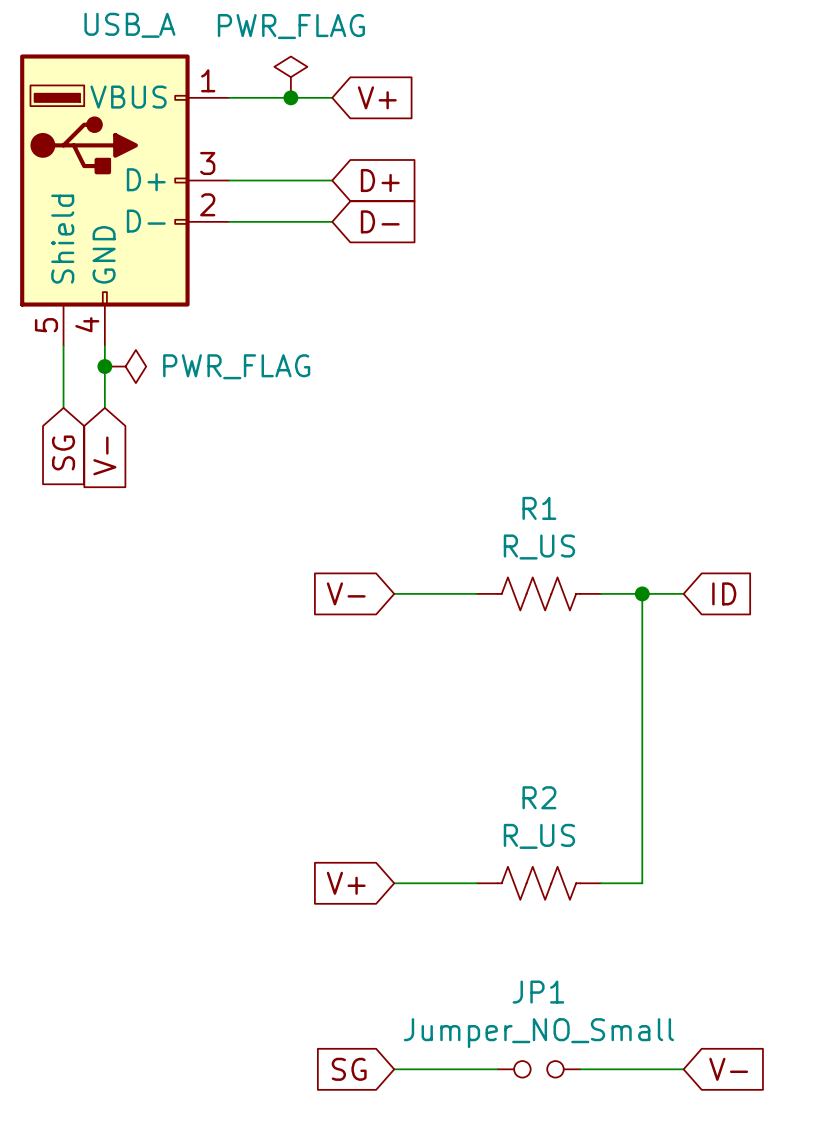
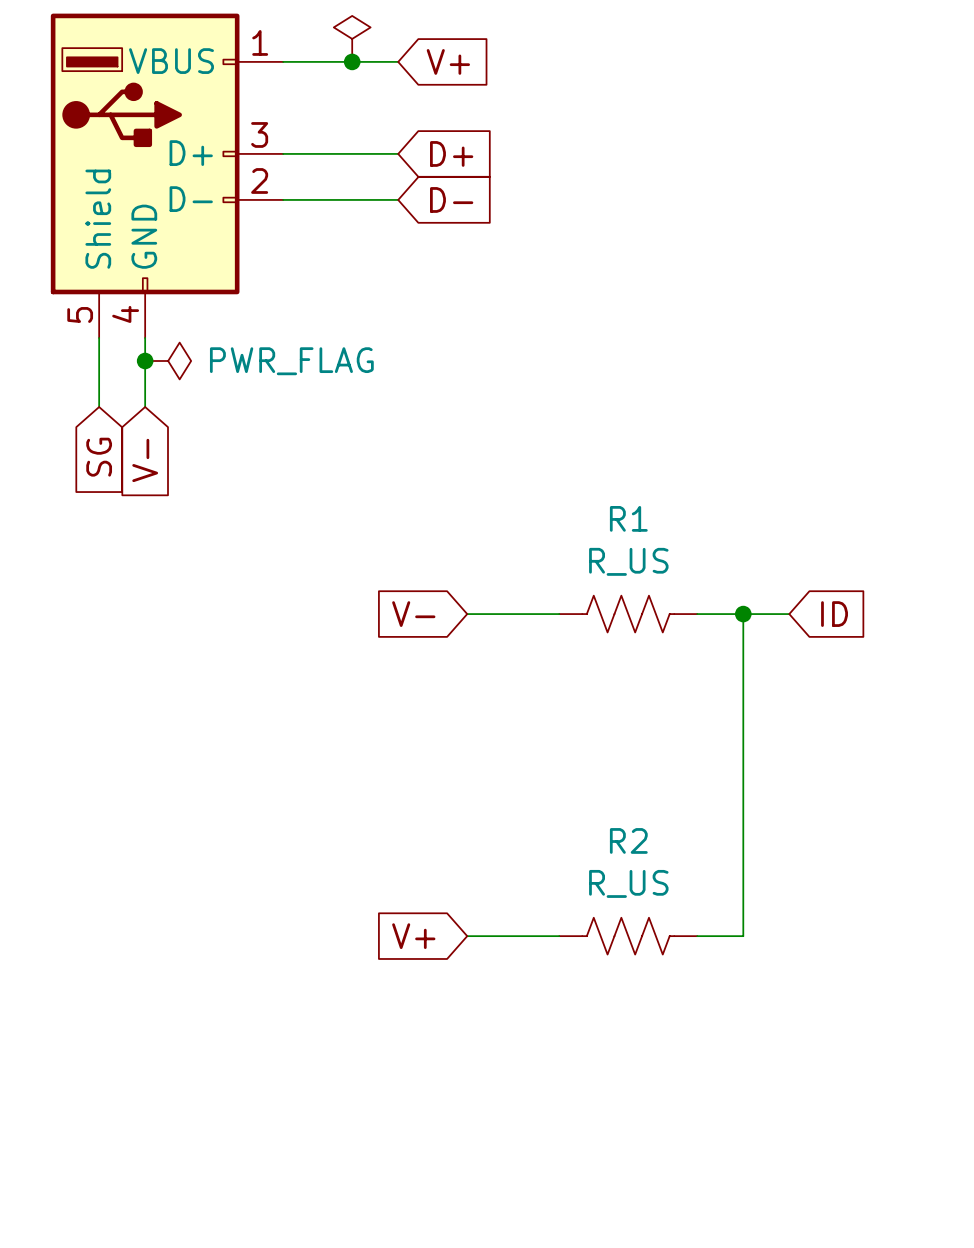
global label: SG (349, 1069) -> none
wire: (394, 1069) (497, 1069) -> none
JP1: Jumper_NO_Small (538, 1069) -> none
wire: (580, 1069) (683, 1069) -> none
global label: V- (728, 1069) -> none

